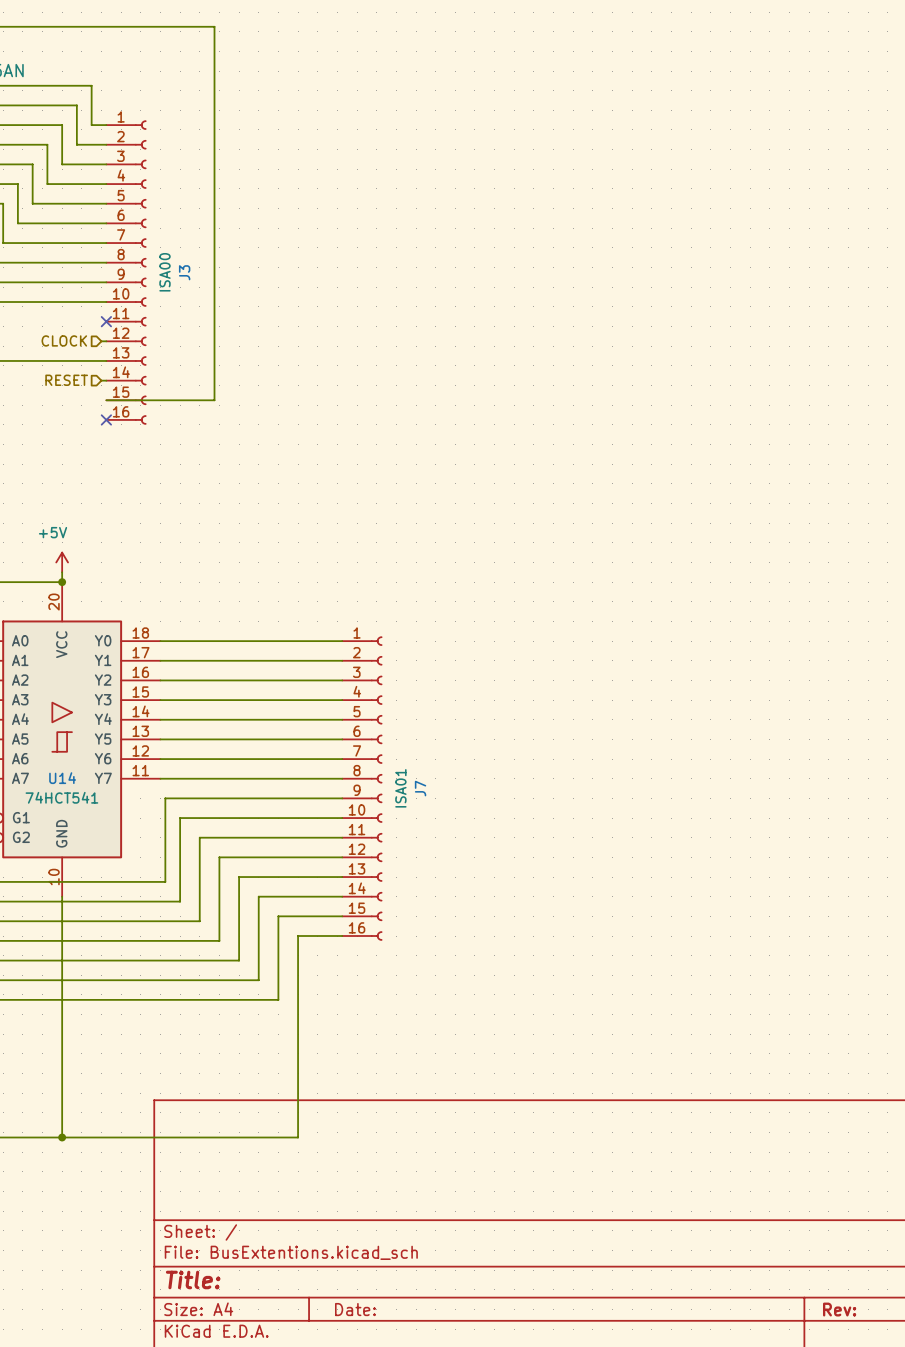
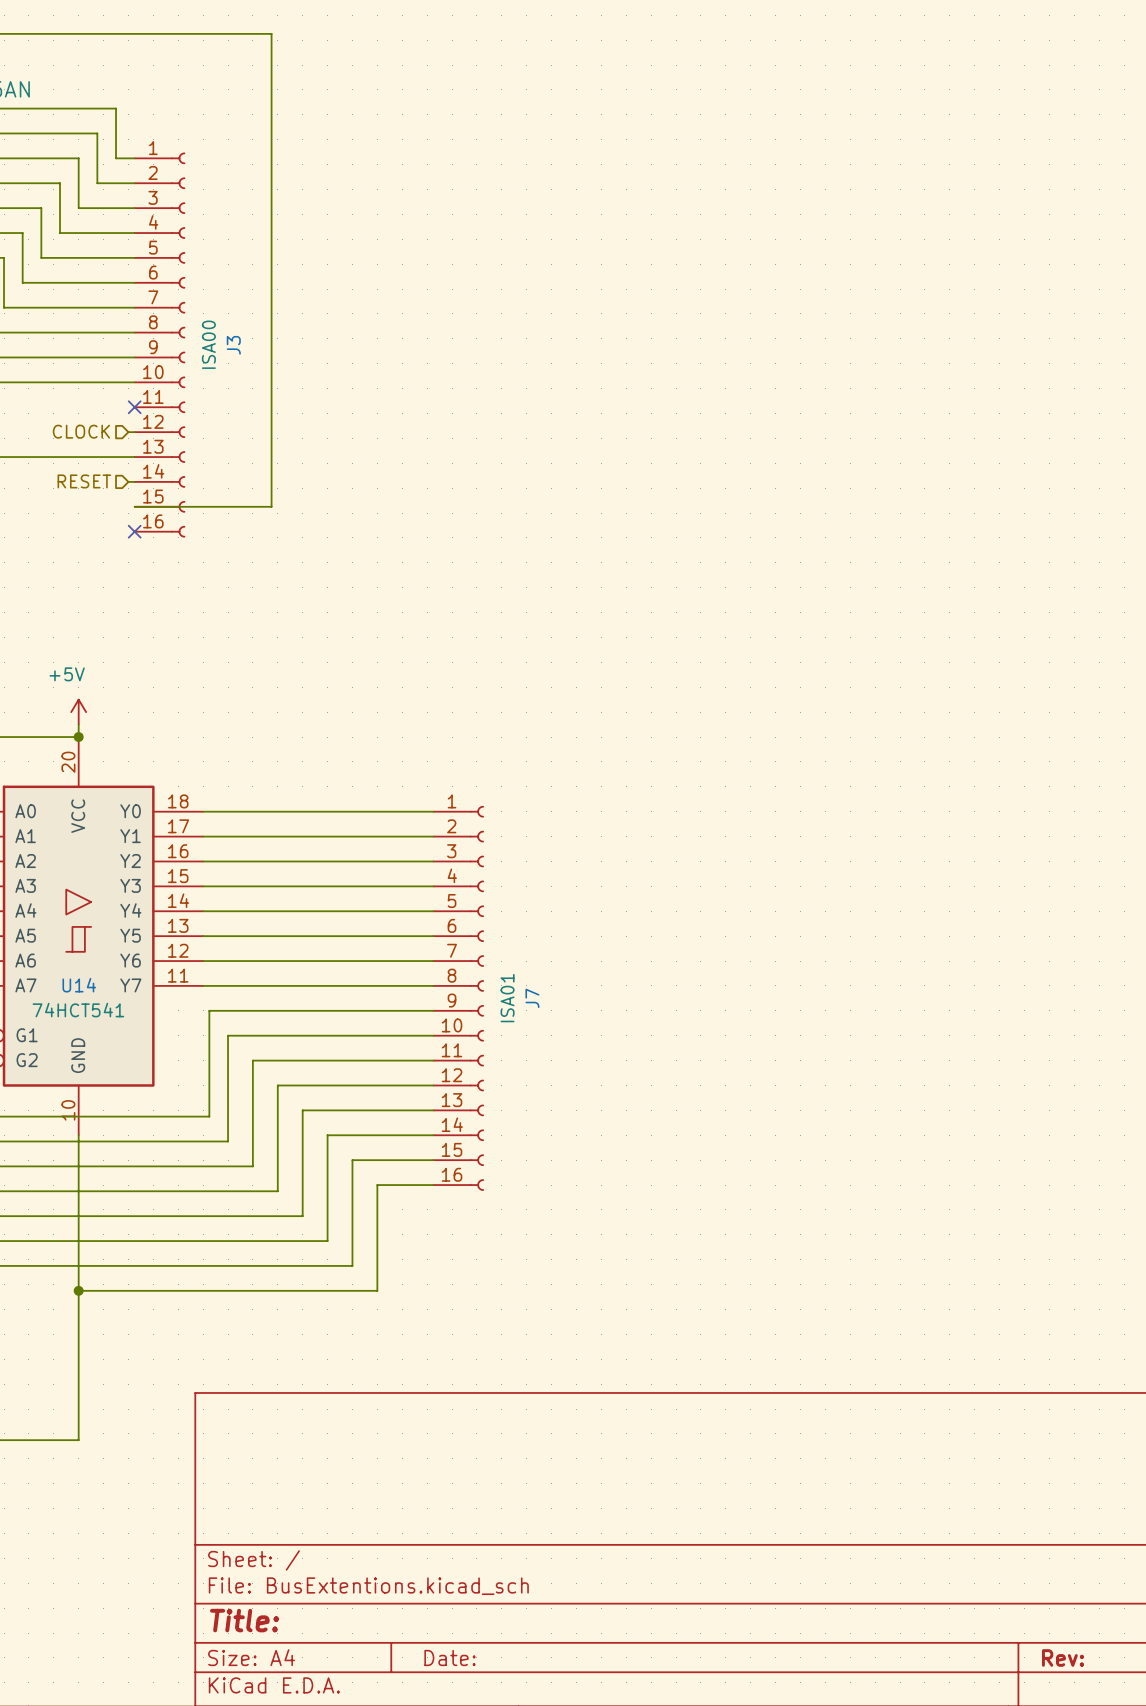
junction: none -> (78, 1290)
wire: (298, 1019) (298, 1137) (62, 1137) -> (377, 1290) (78, 1290)
junction: (62, 1137) -> none

